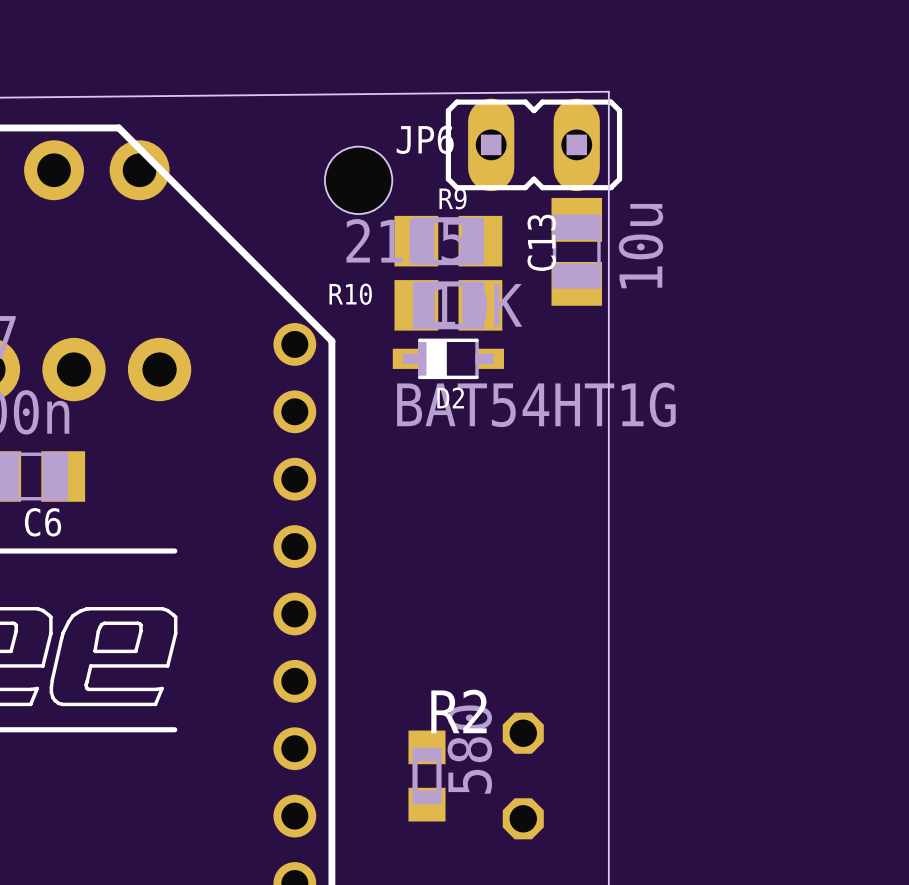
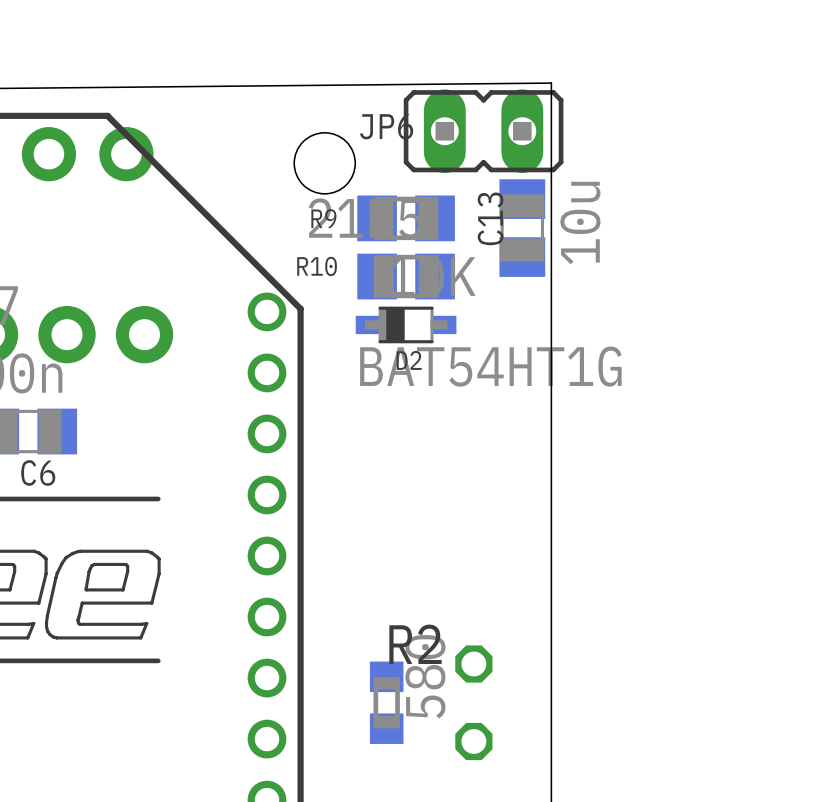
R9 name position: R9 (452, 198) -> R9 (323, 218)

